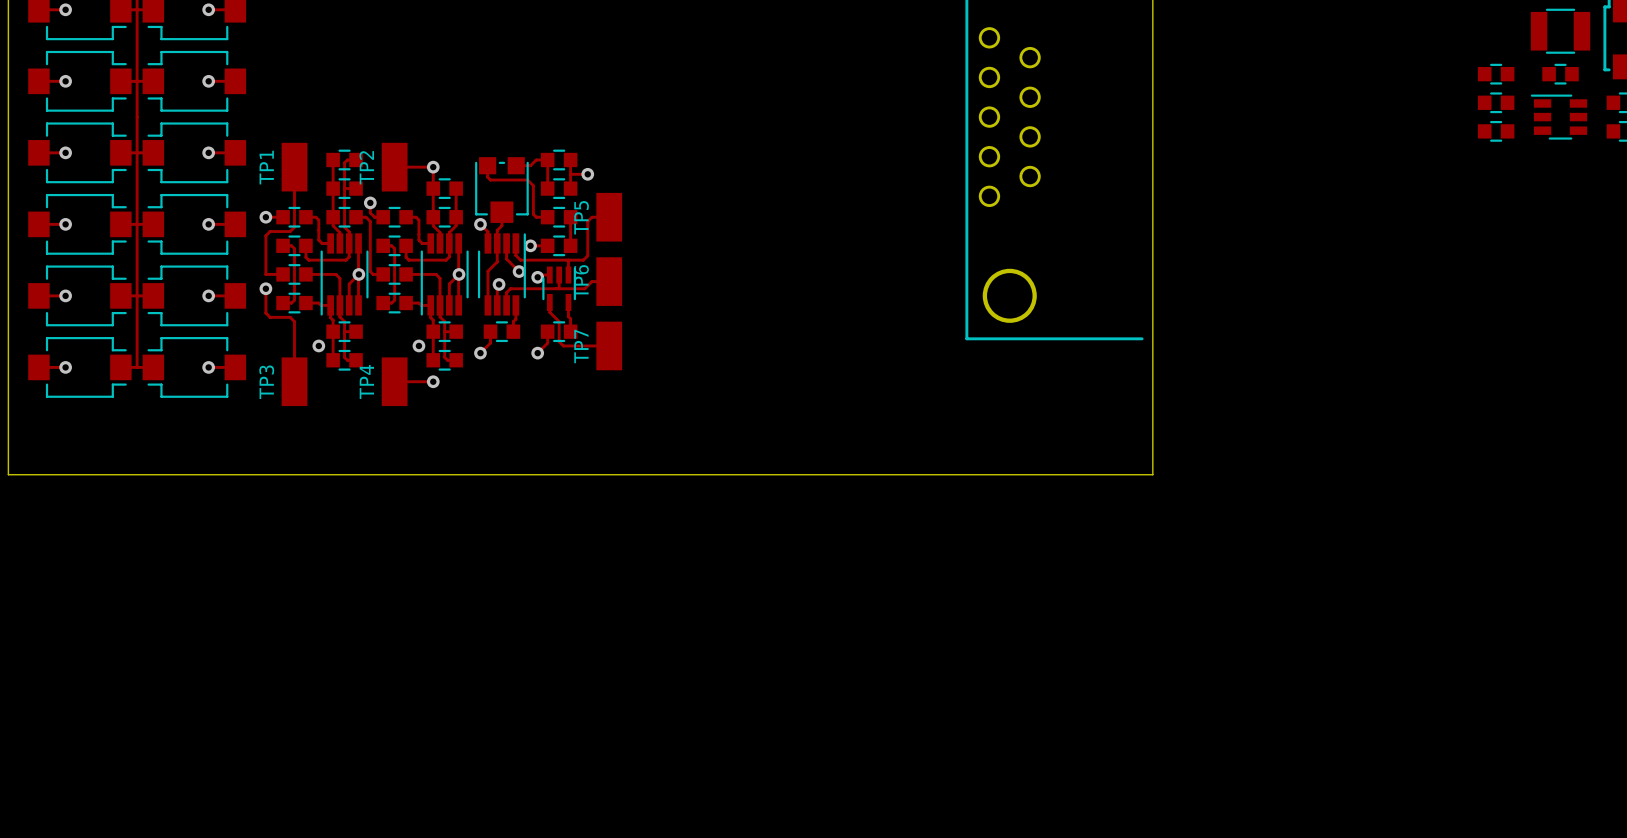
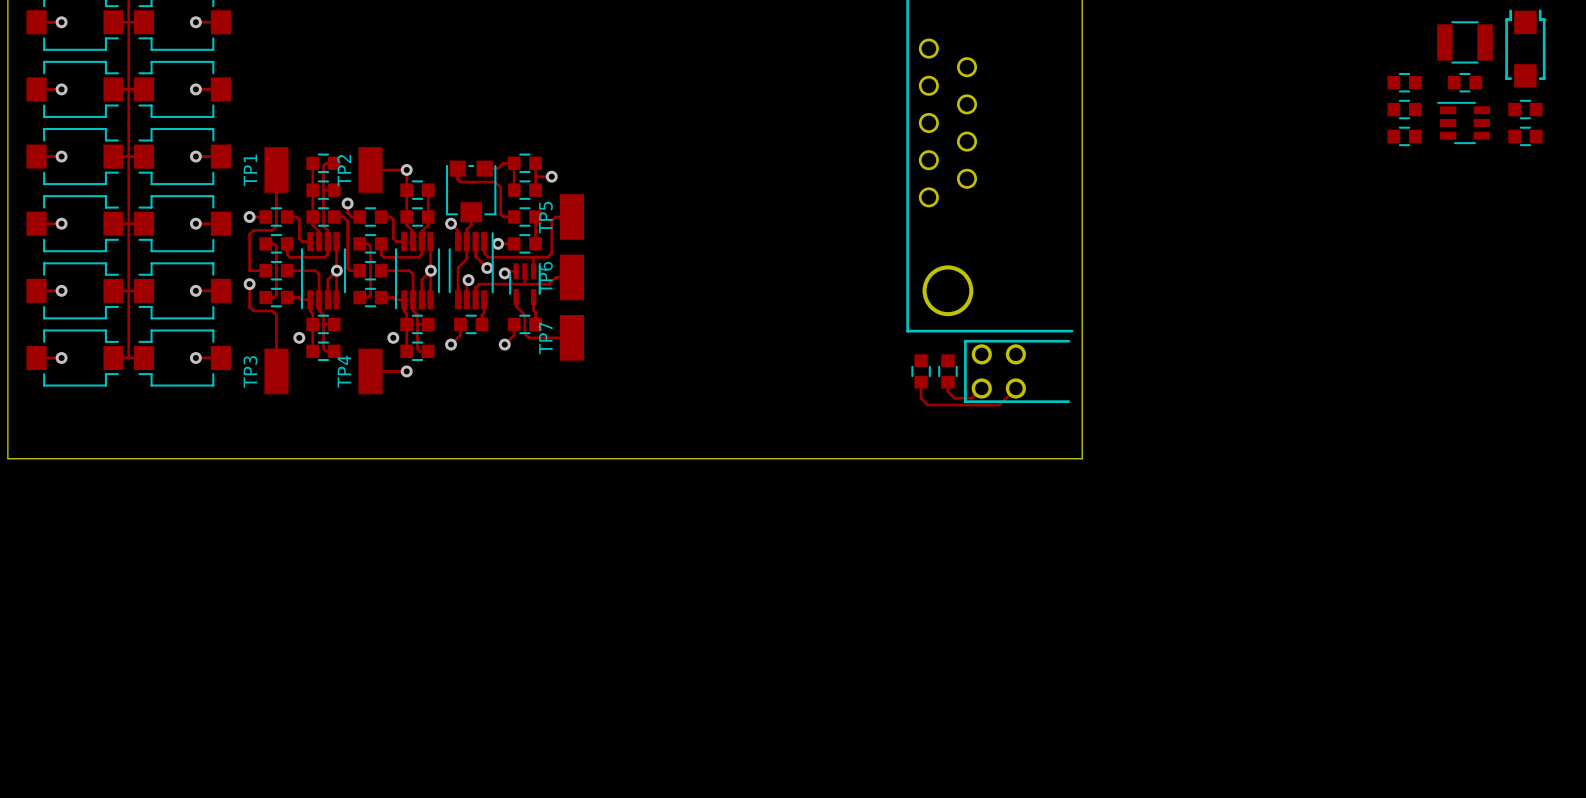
part: none -> (921, 371)
part: none -> (947, 371)
part: none -> (1017, 371)
track: none -> (921, 382) (921, 398) (927, 405) (999, 405) (1015, 388)
track: none -> (947, 382) (947, 391) (954, 398) (971, 398) (981, 388)

